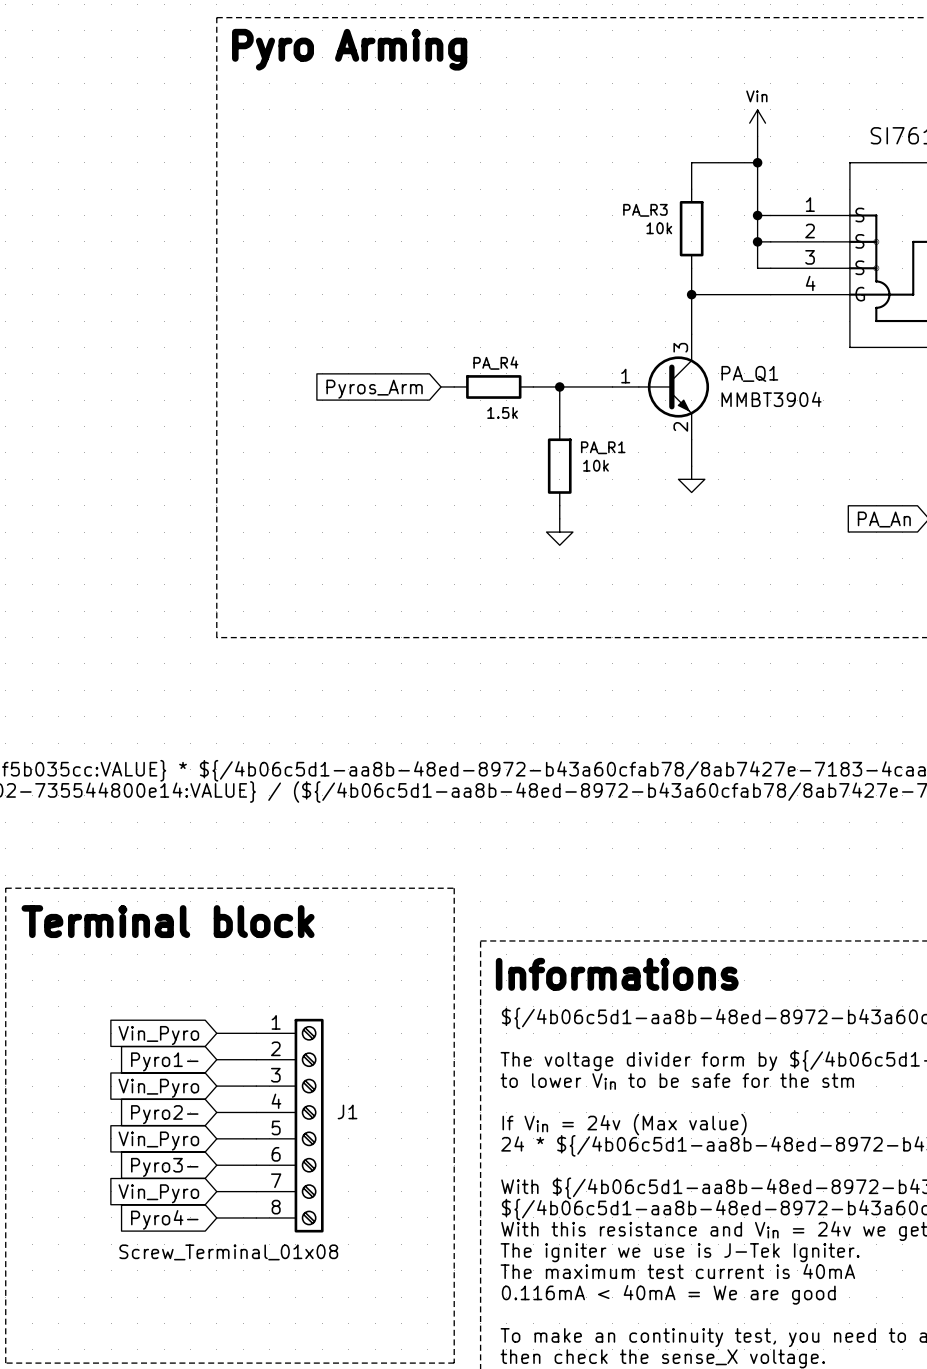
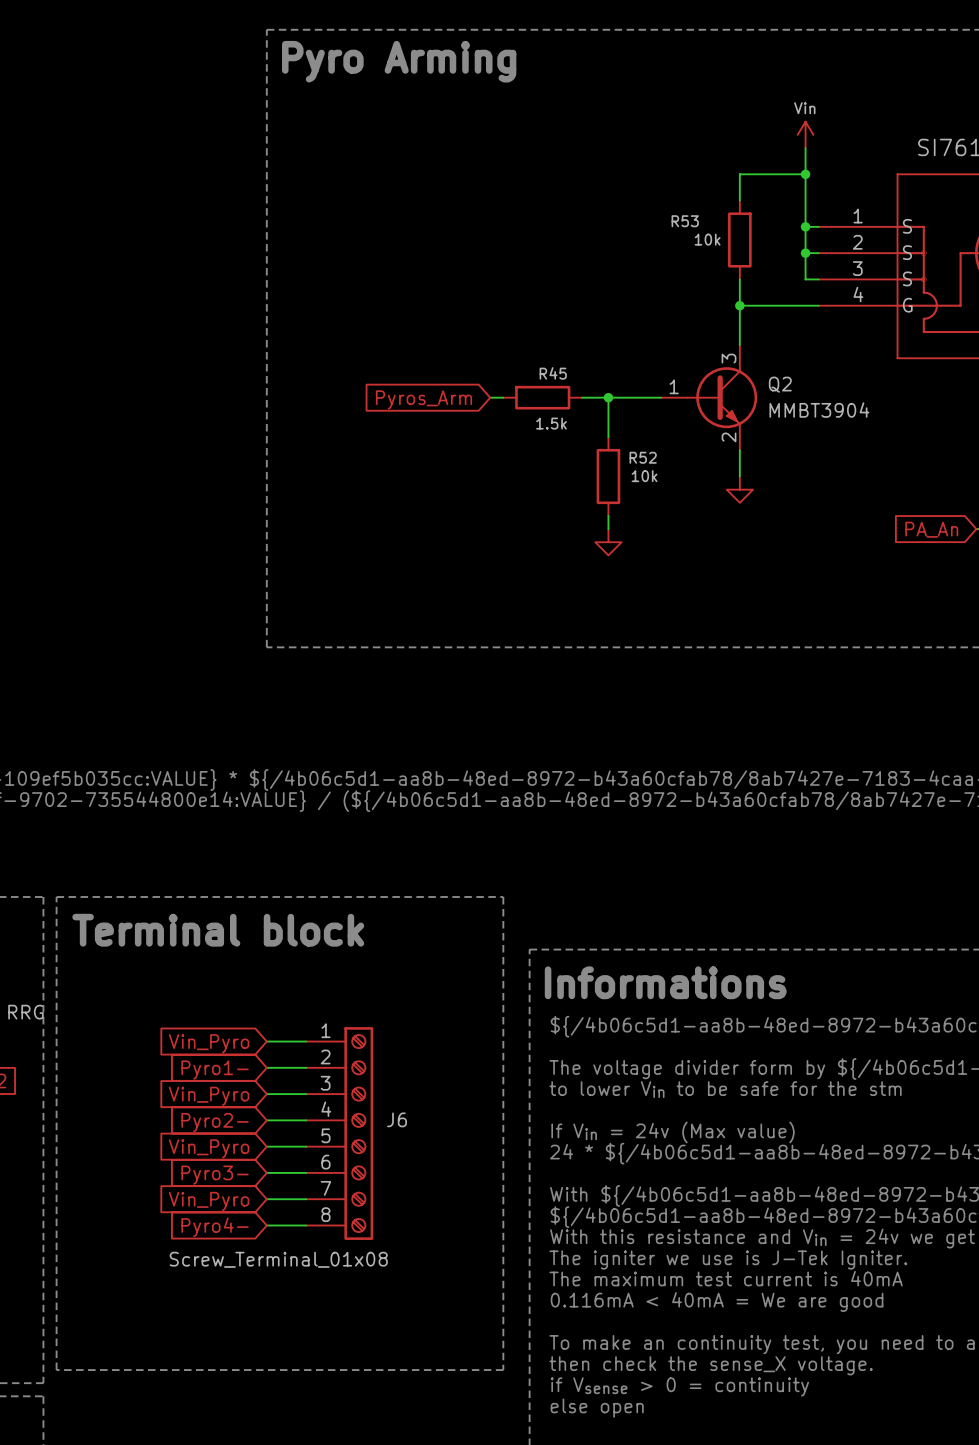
PA_R3 name: PA_R3 (645, 210) -> R53 (685, 221)
PA_R4 name: PA_R4 (495, 363) -> R45 (553, 373)
PA_Q1 name: PA_Q1 (749, 373) -> Q2 (780, 384)
PA_R1 name: PA_R1 (603, 447) -> R52 (643, 457)
J1 name: J1 (347, 1111) -> J6 (397, 1119)

